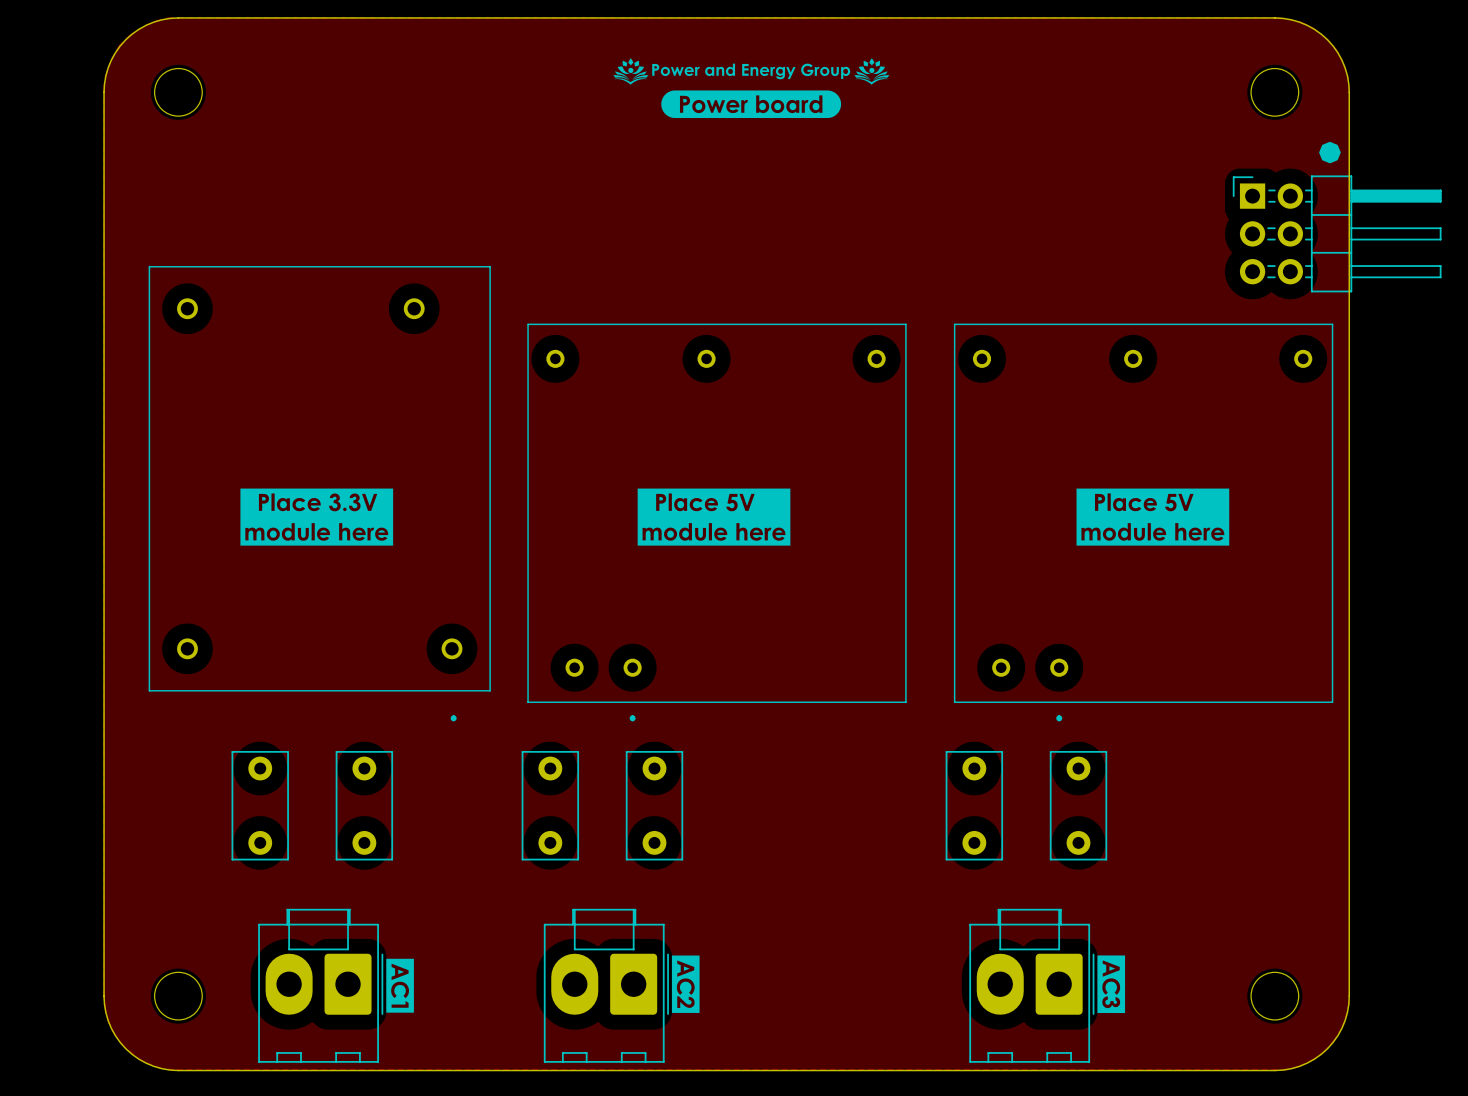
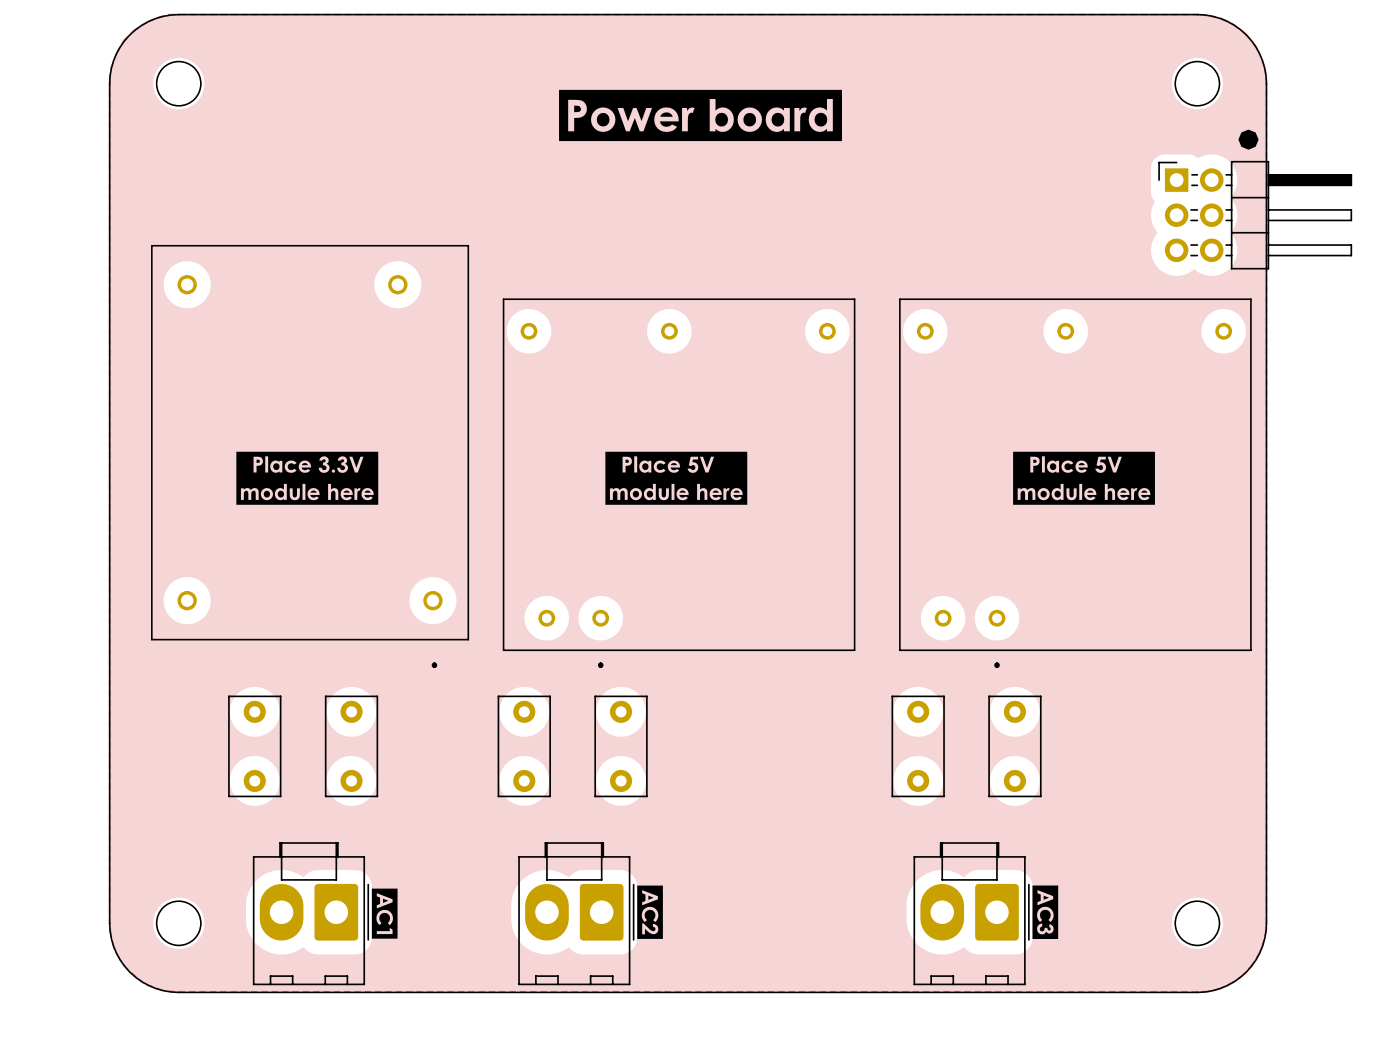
drawing: [613, 58, 890, 119] -> none
drawing: none -> [559, 89, 842, 142]

